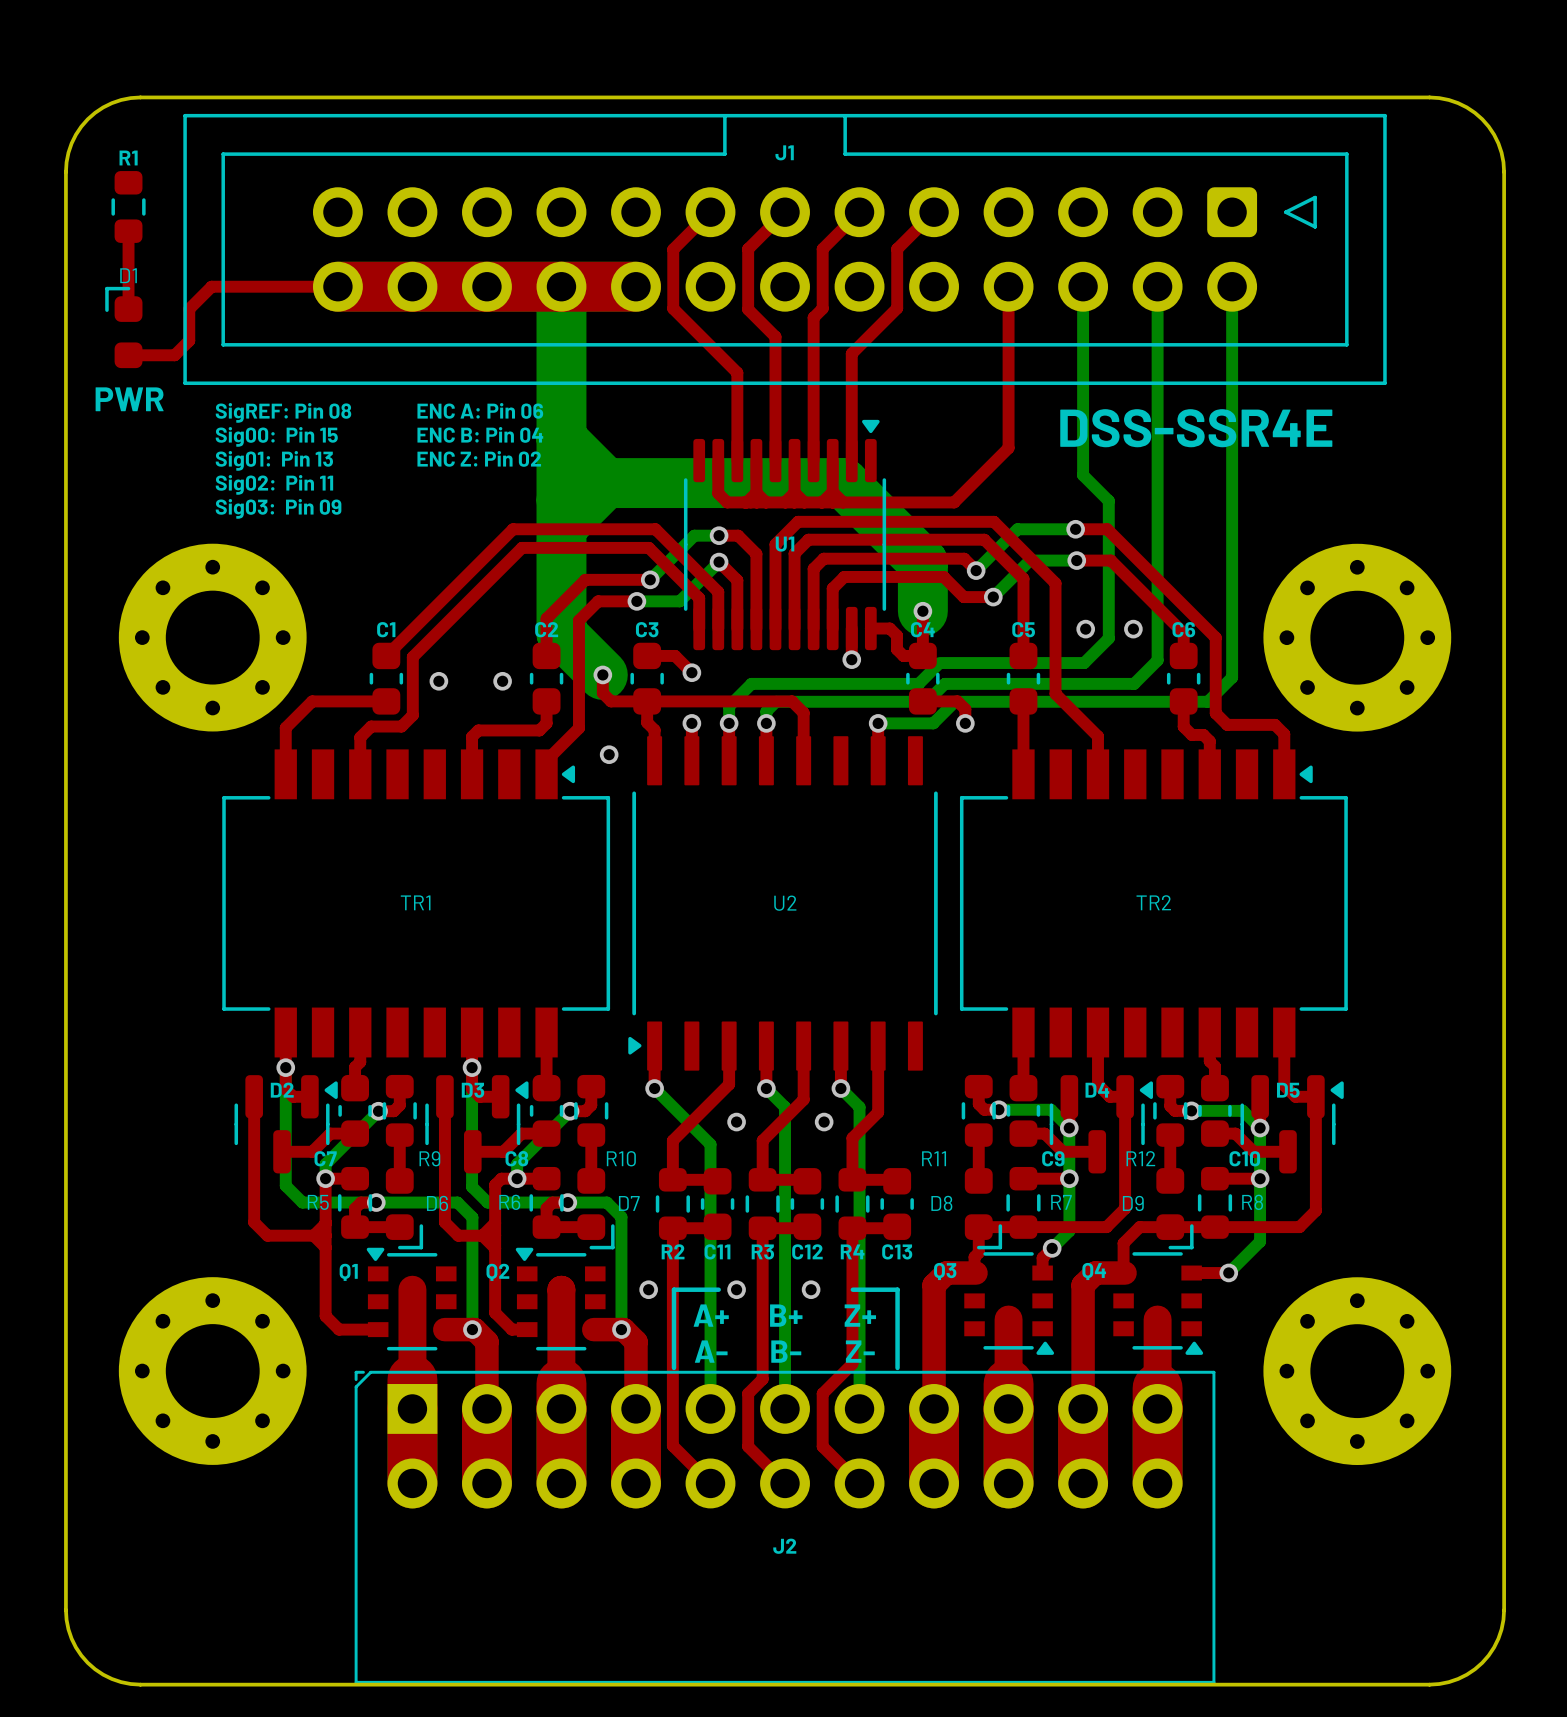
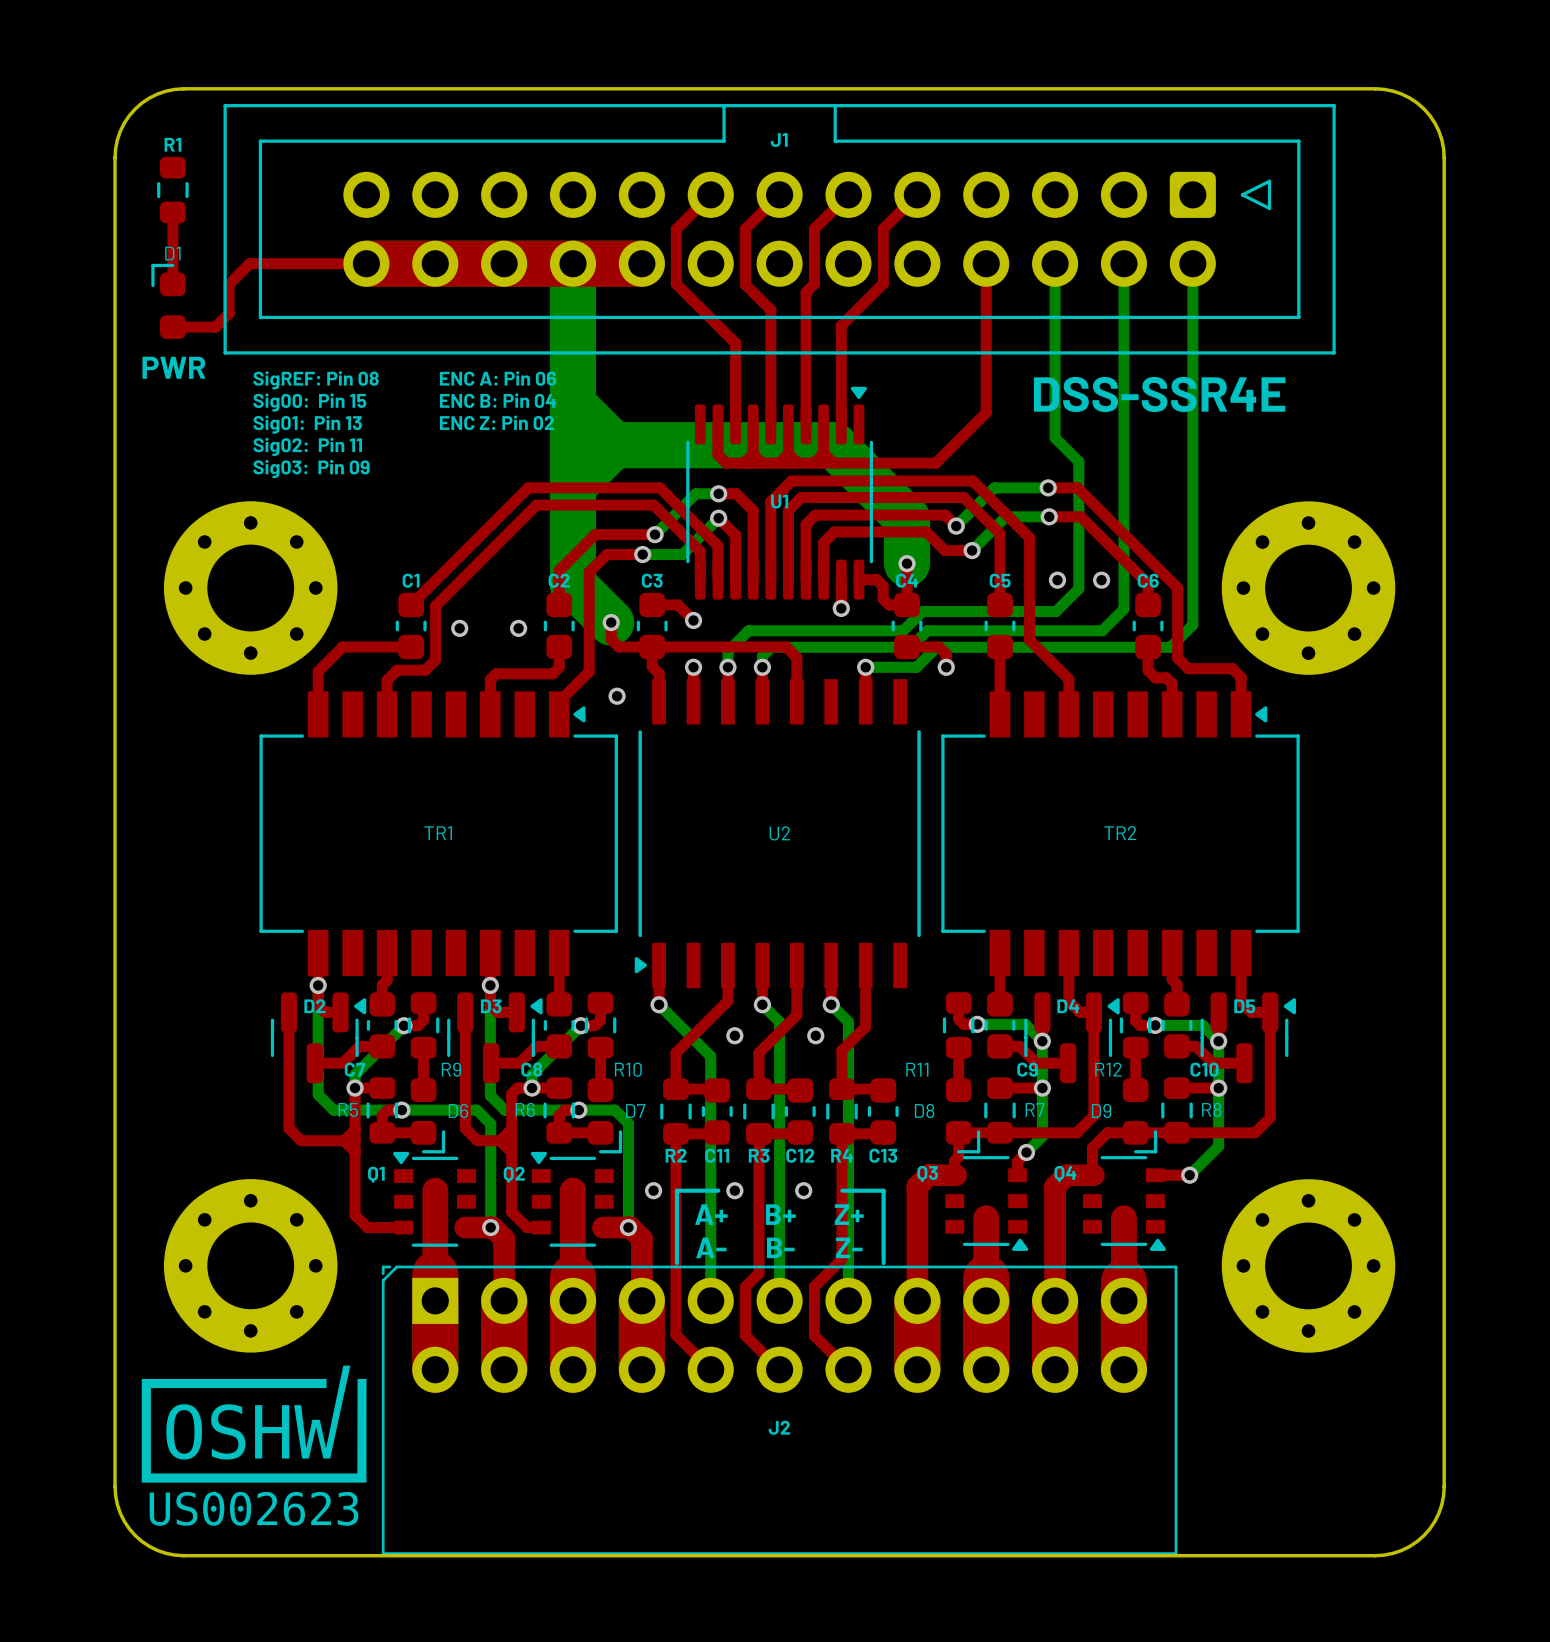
drawing: none -> [141, 1365, 367, 1526]

